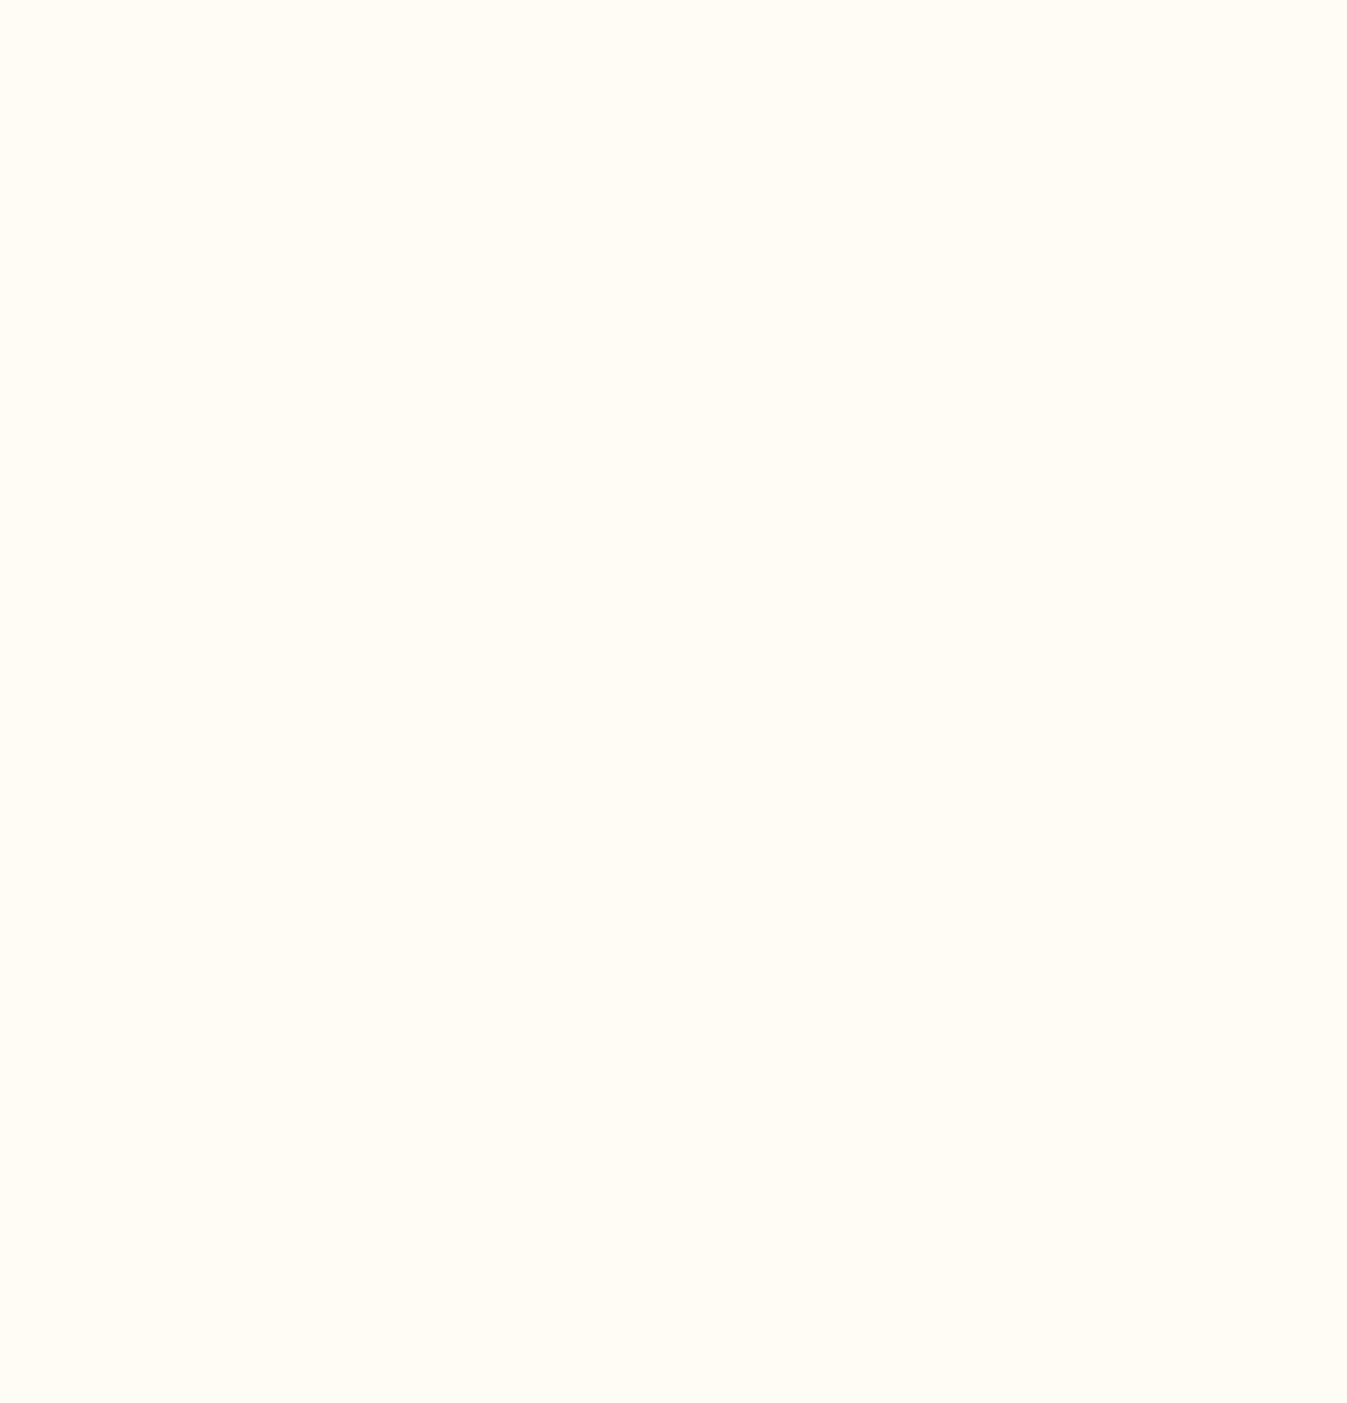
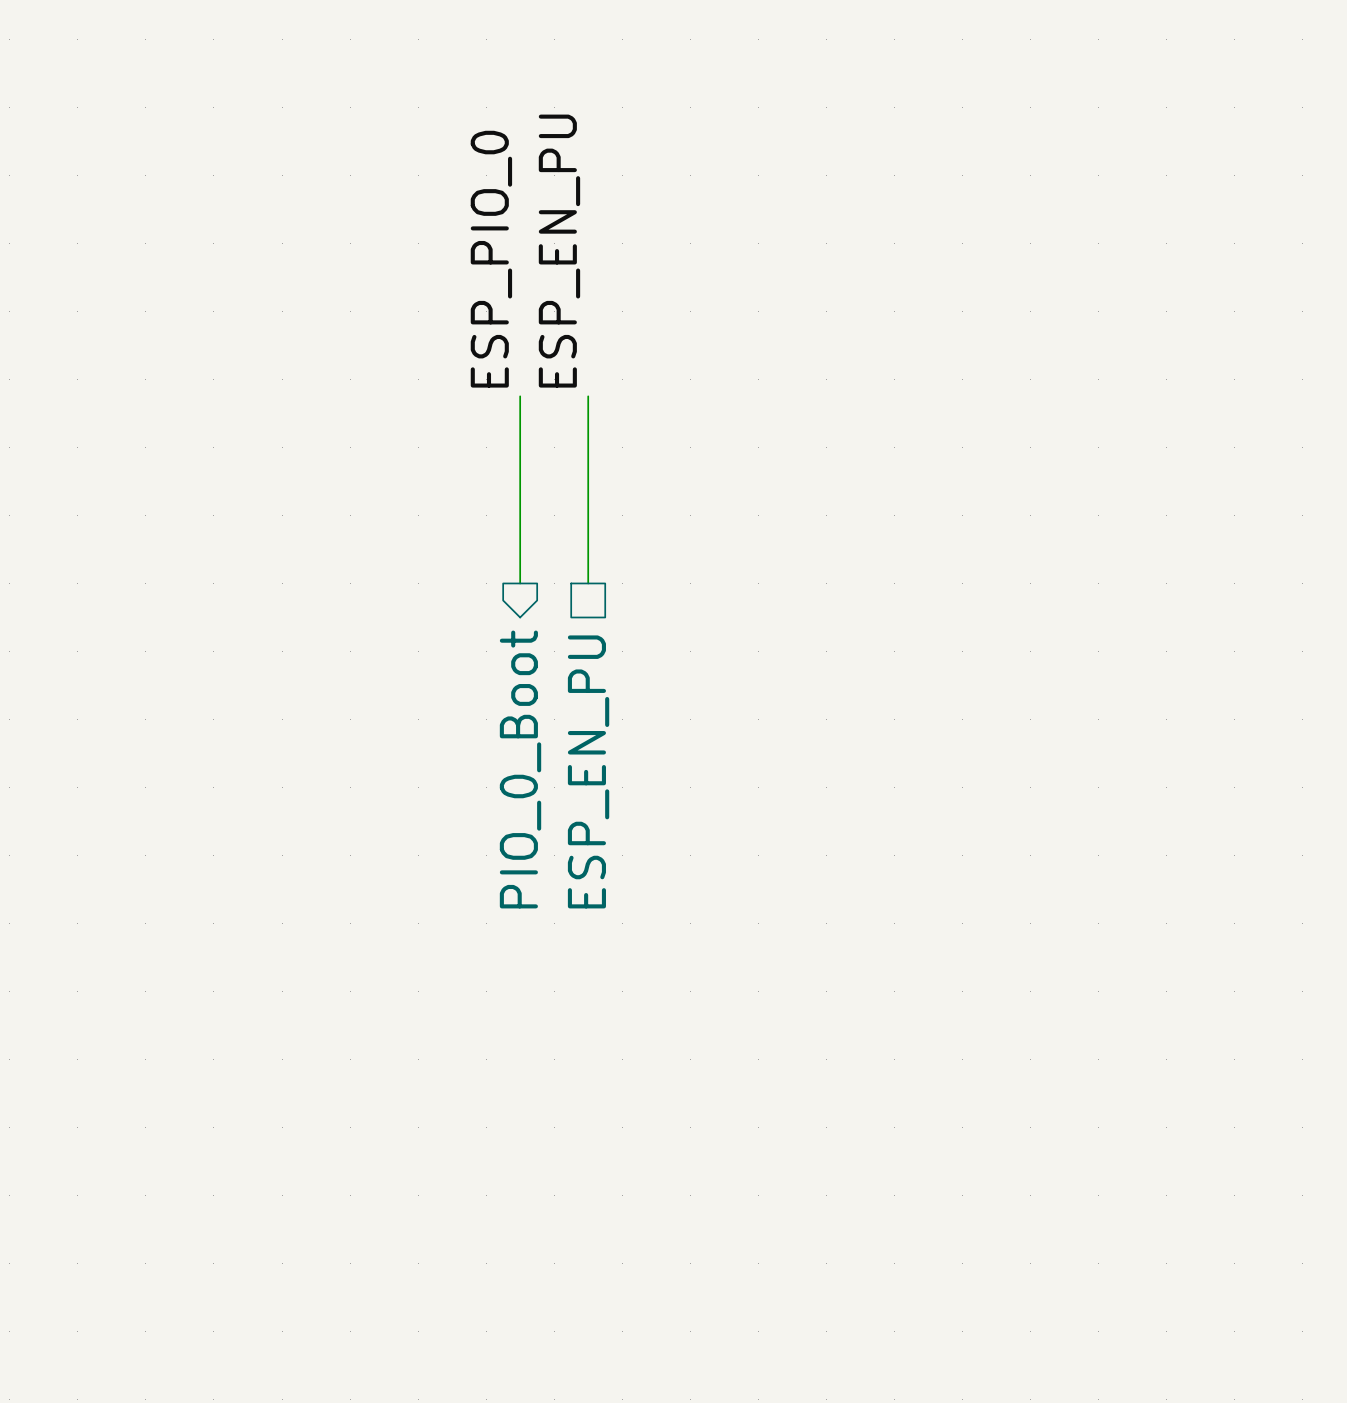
label: none -> ESP_EN_PU (559, 251)
label: none -> ESP_PIO_0 (491, 259)
wire: none -> (520, 396) (520, 583)
wire: none -> (588, 396) (588, 583)
sheet pin: none -> PIO_0_Boot (520, 769)
sheet pin: none -> ESP_EN_PU (588, 771)

